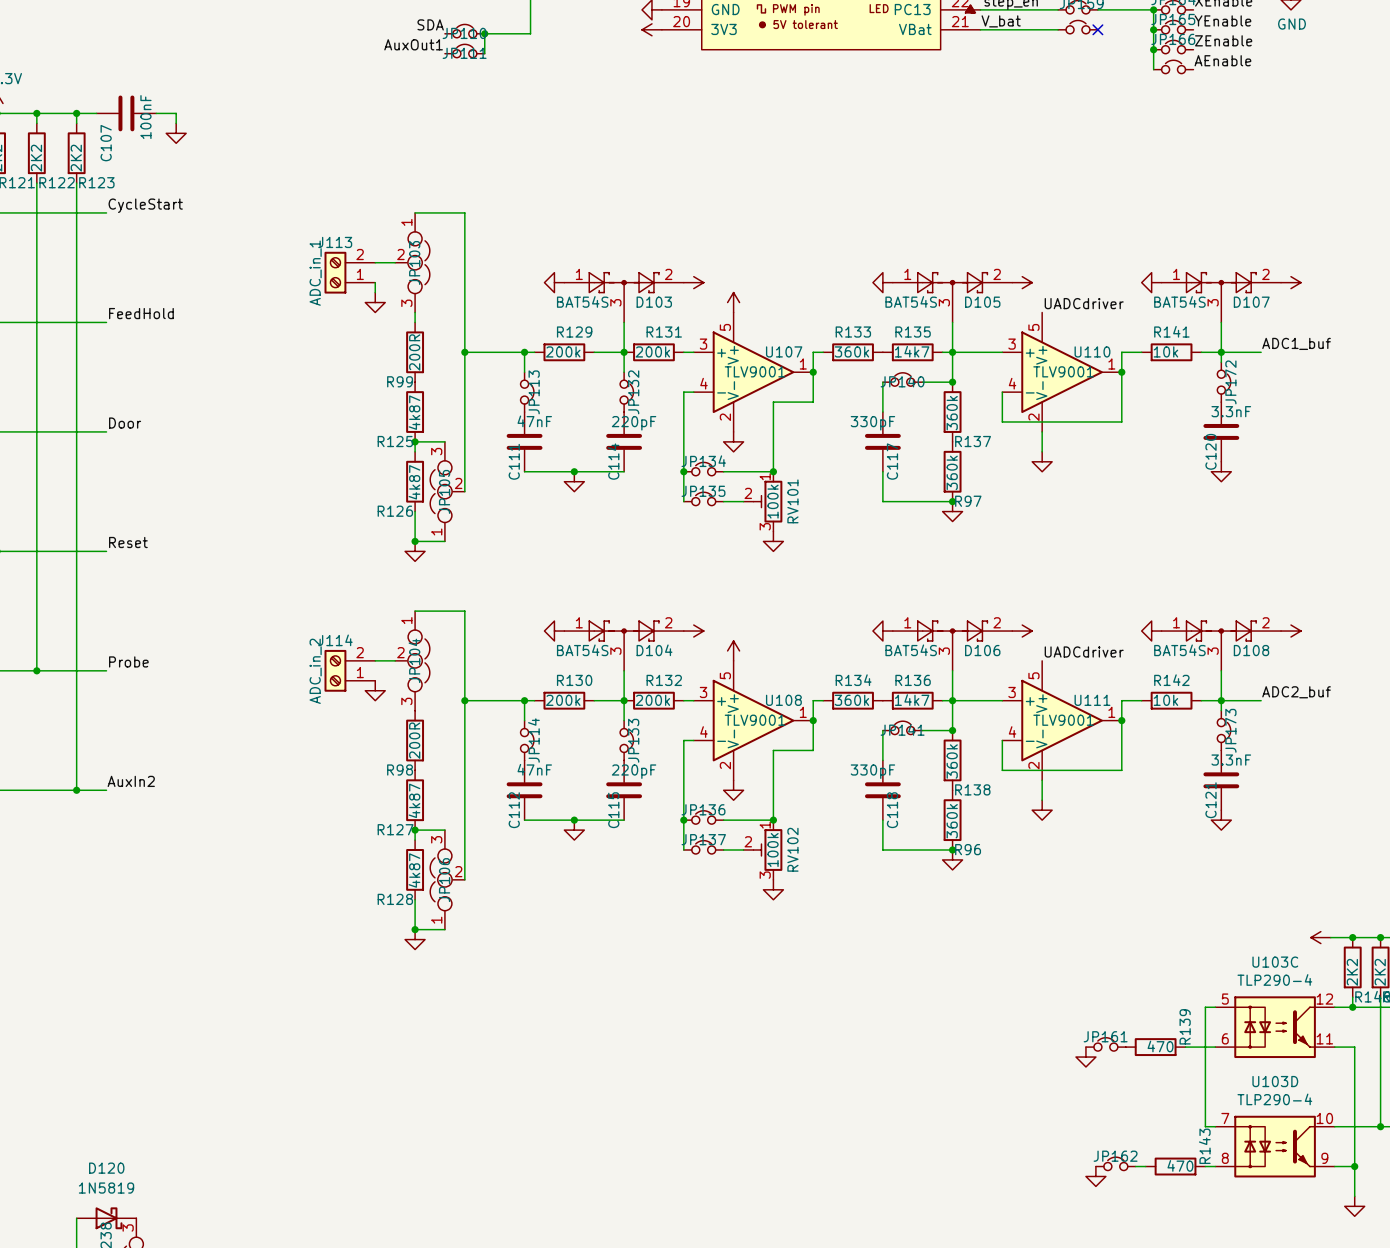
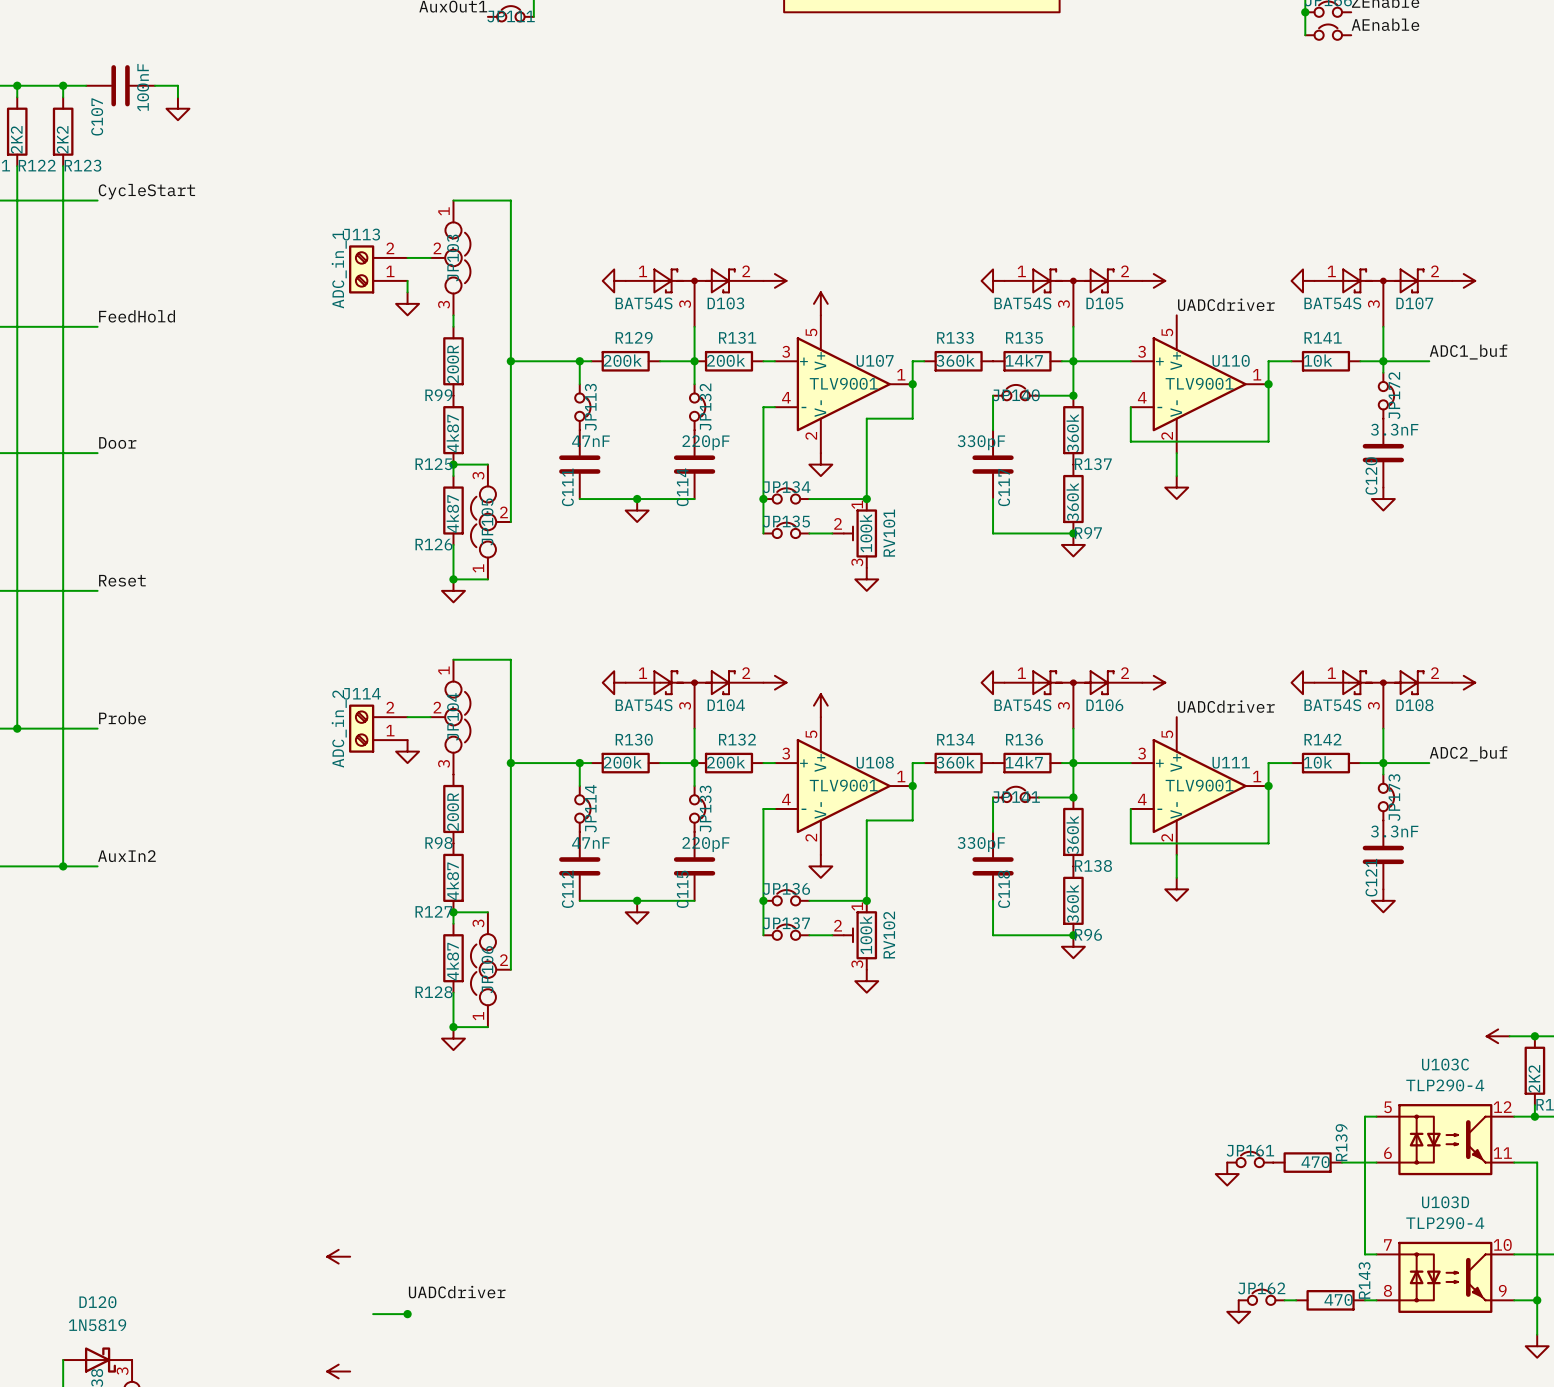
power symbol: none -> (338, 1256)
label: none -> UADCdriver (457, 1292)
wire: none -> (373, 1314) (407, 1314)
junction: none -> (407, 1314)
power symbol: none -> (338, 1371)

